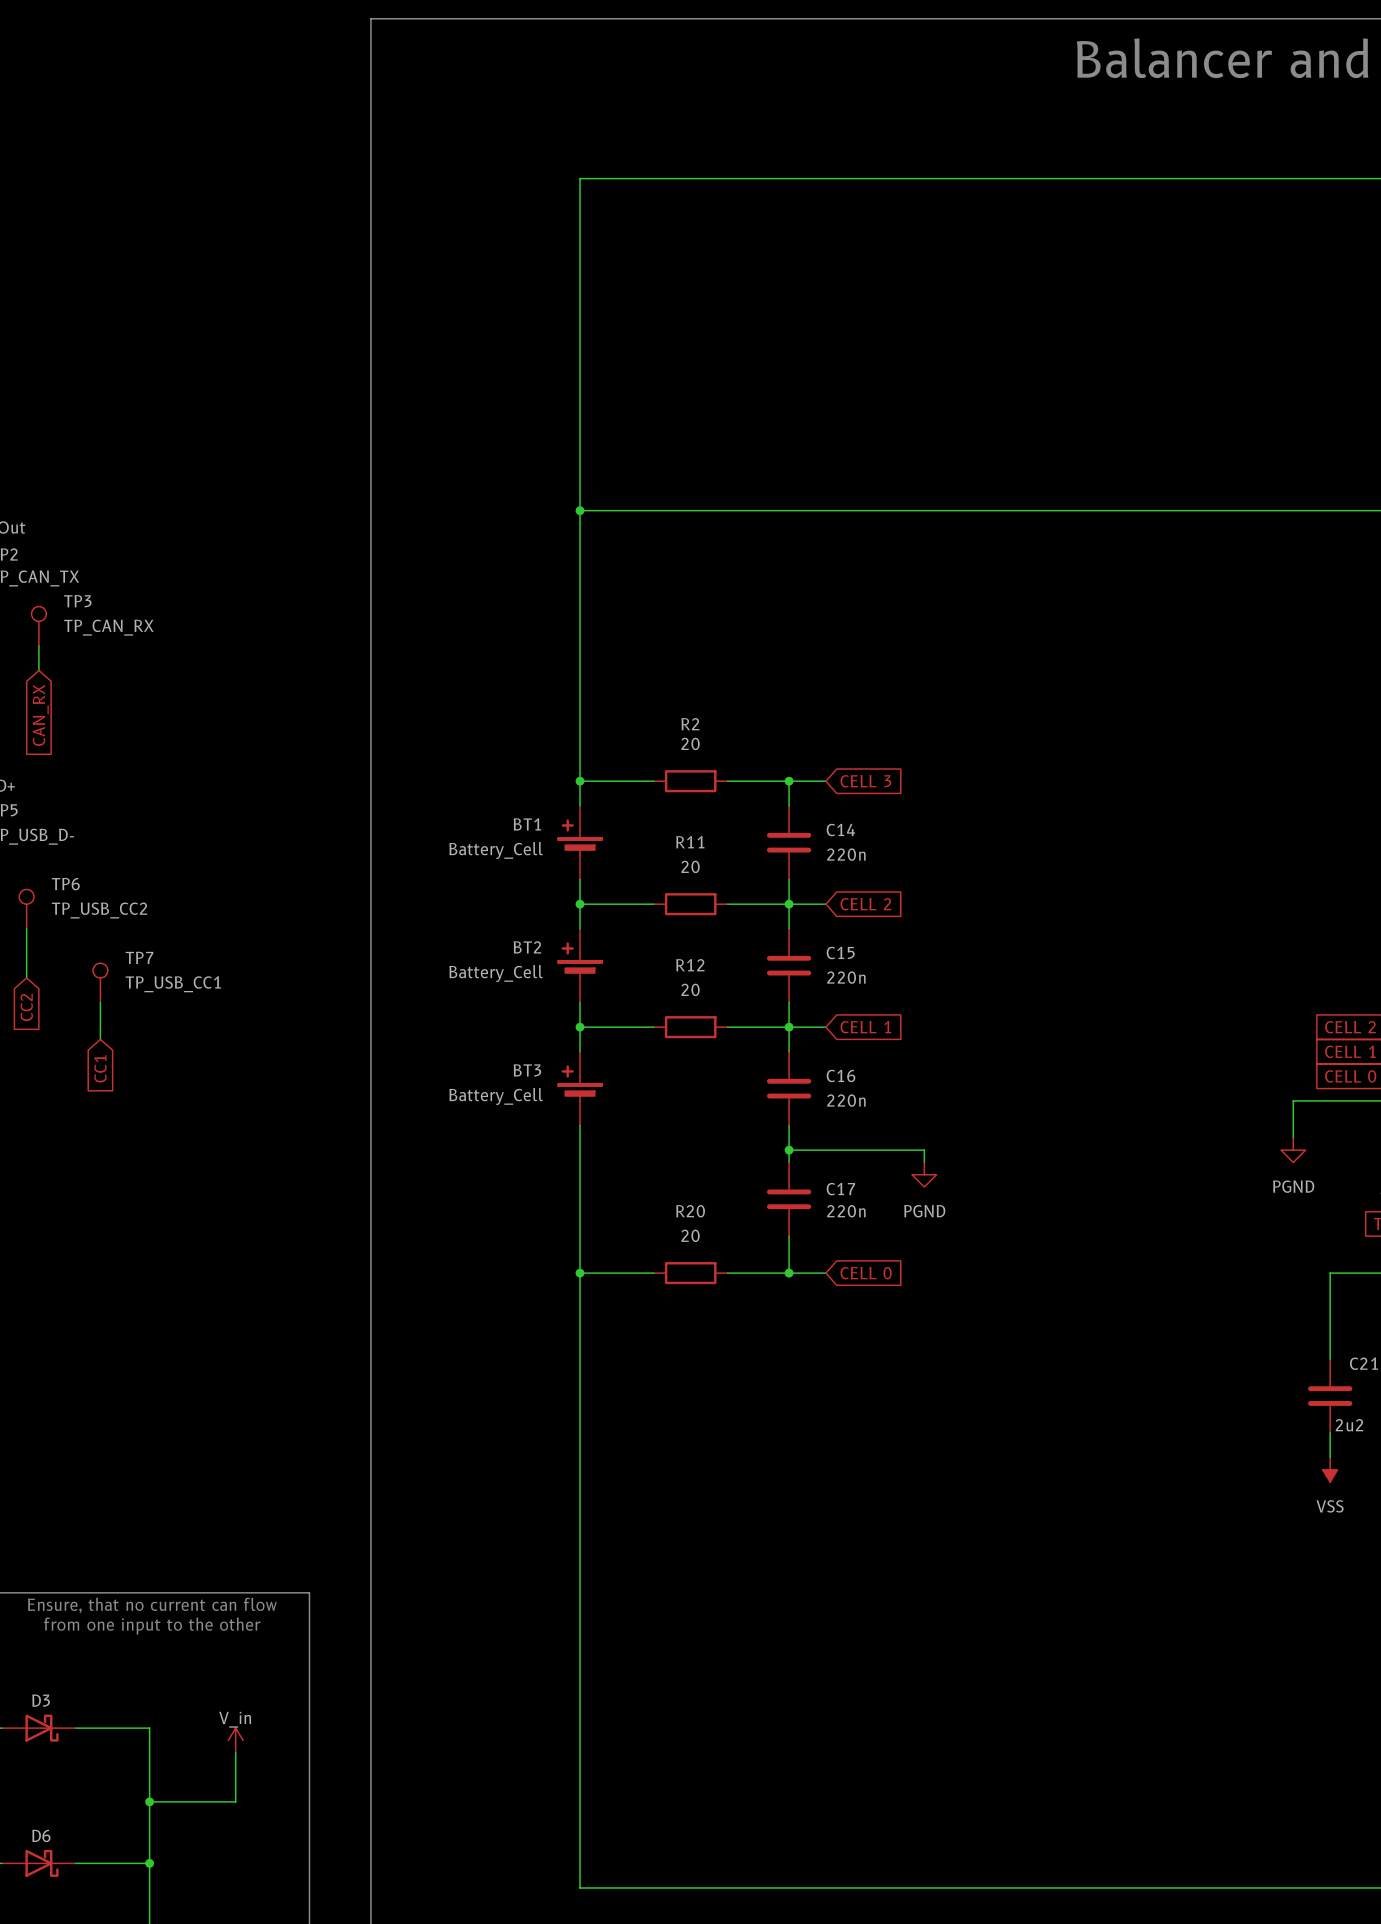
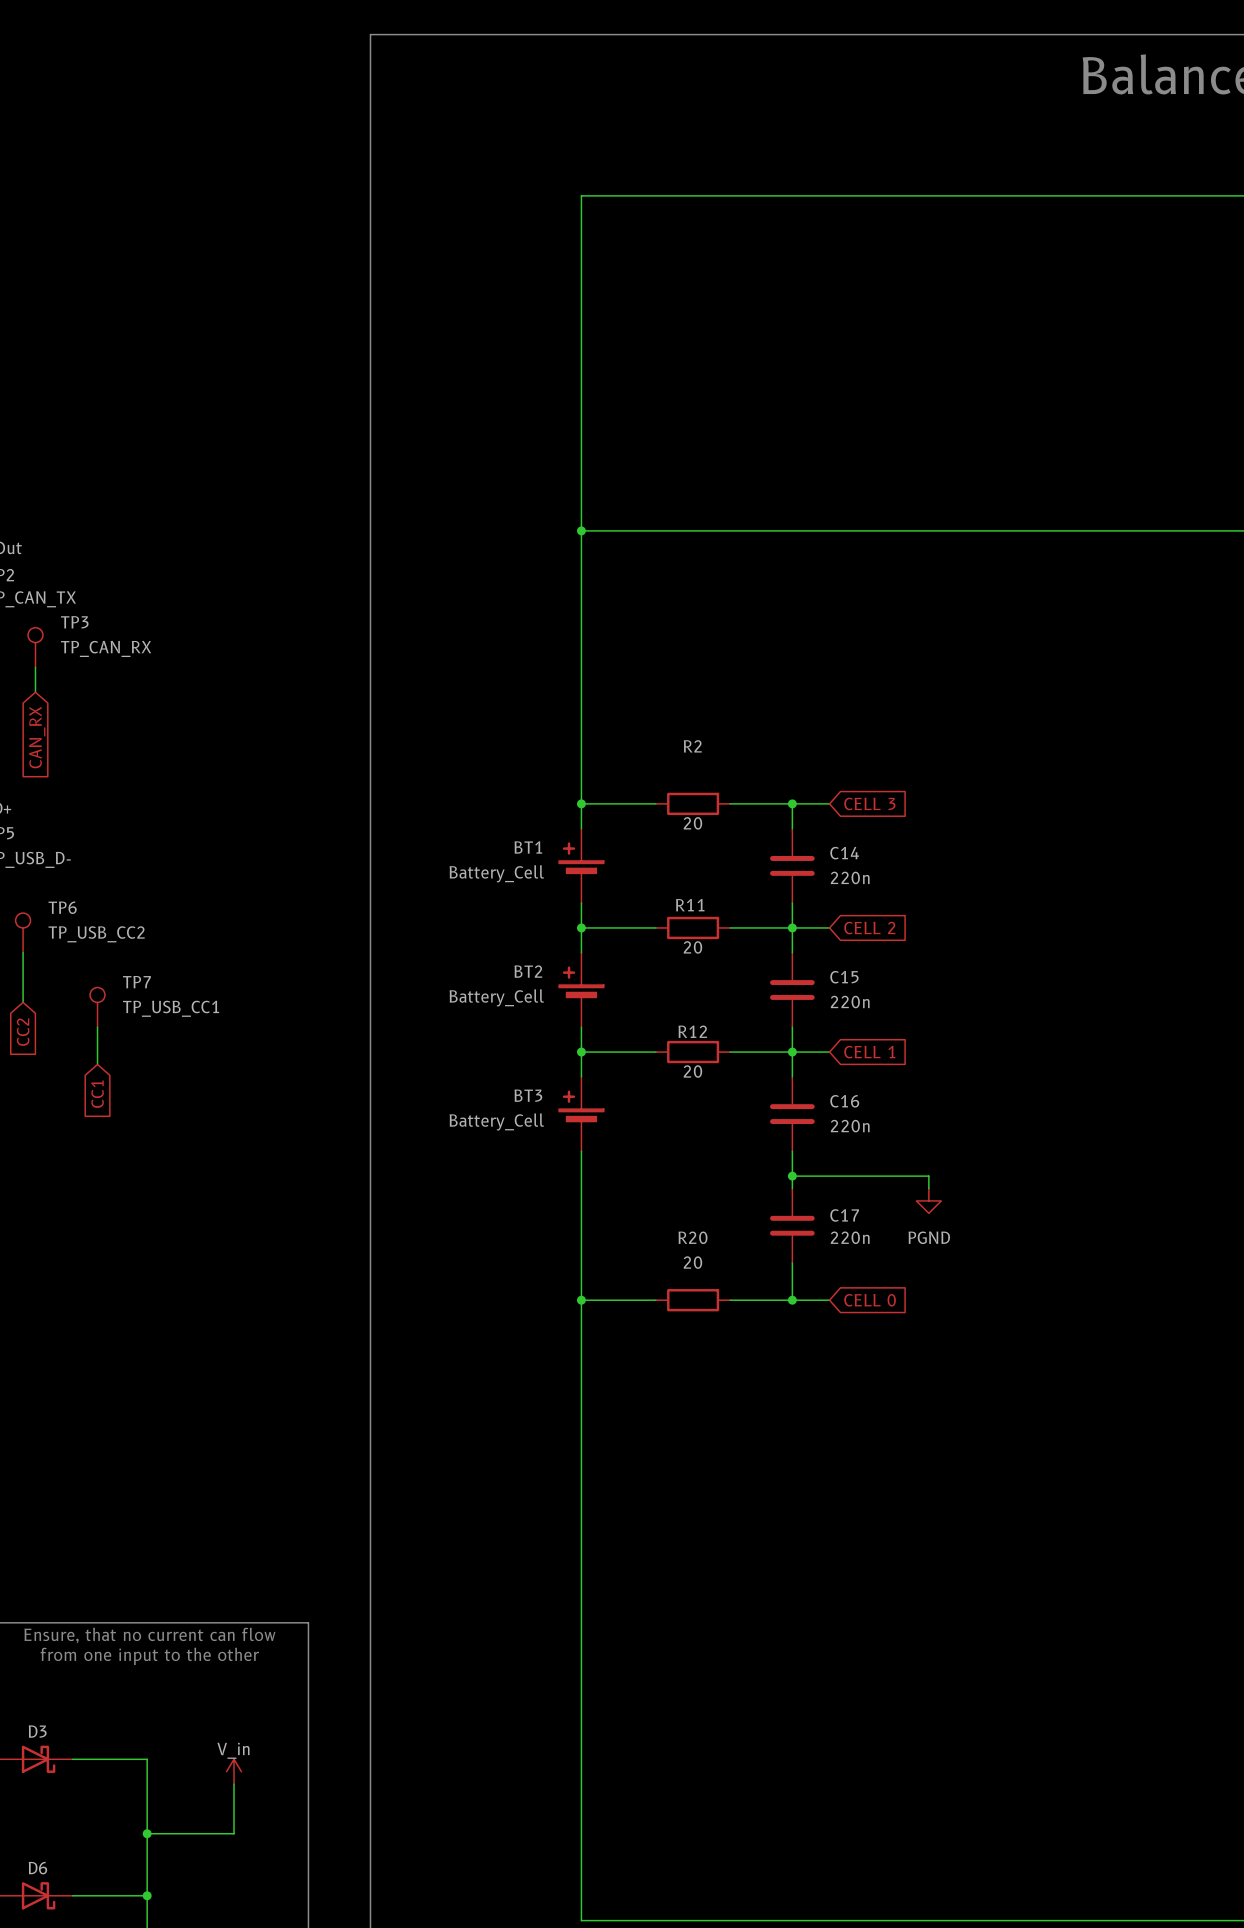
R2 value position: 20 (690, 743) -> 20 (692, 823)
R11 name position: R11 (690, 842) -> R11 (690, 905)
R11 value position: 20 (690, 866) -> 20 (692, 947)
R12 name position: R12 (690, 965) -> R12 (692, 1031)
R12 value position: 20 (690, 989) -> 20 (692, 1071)

